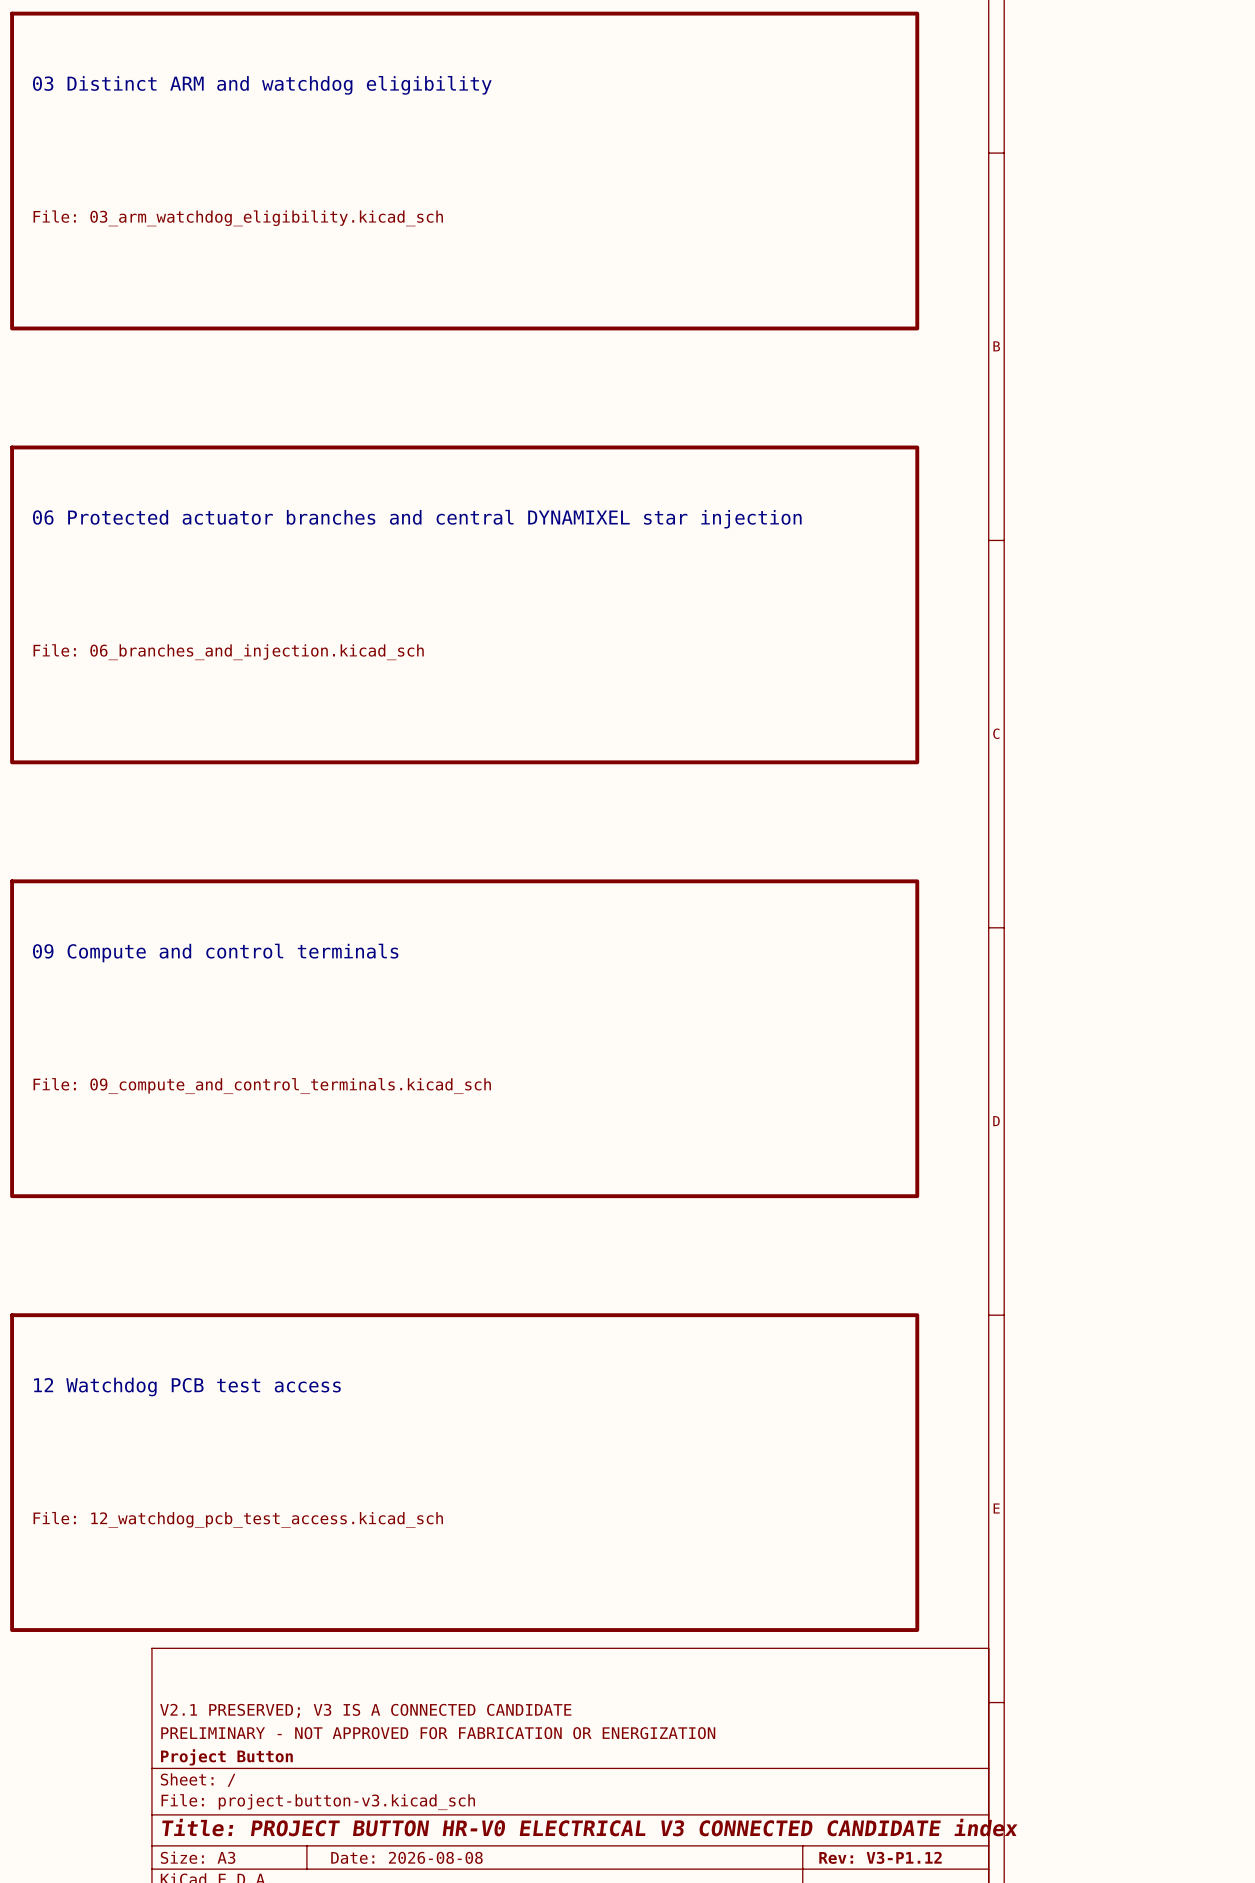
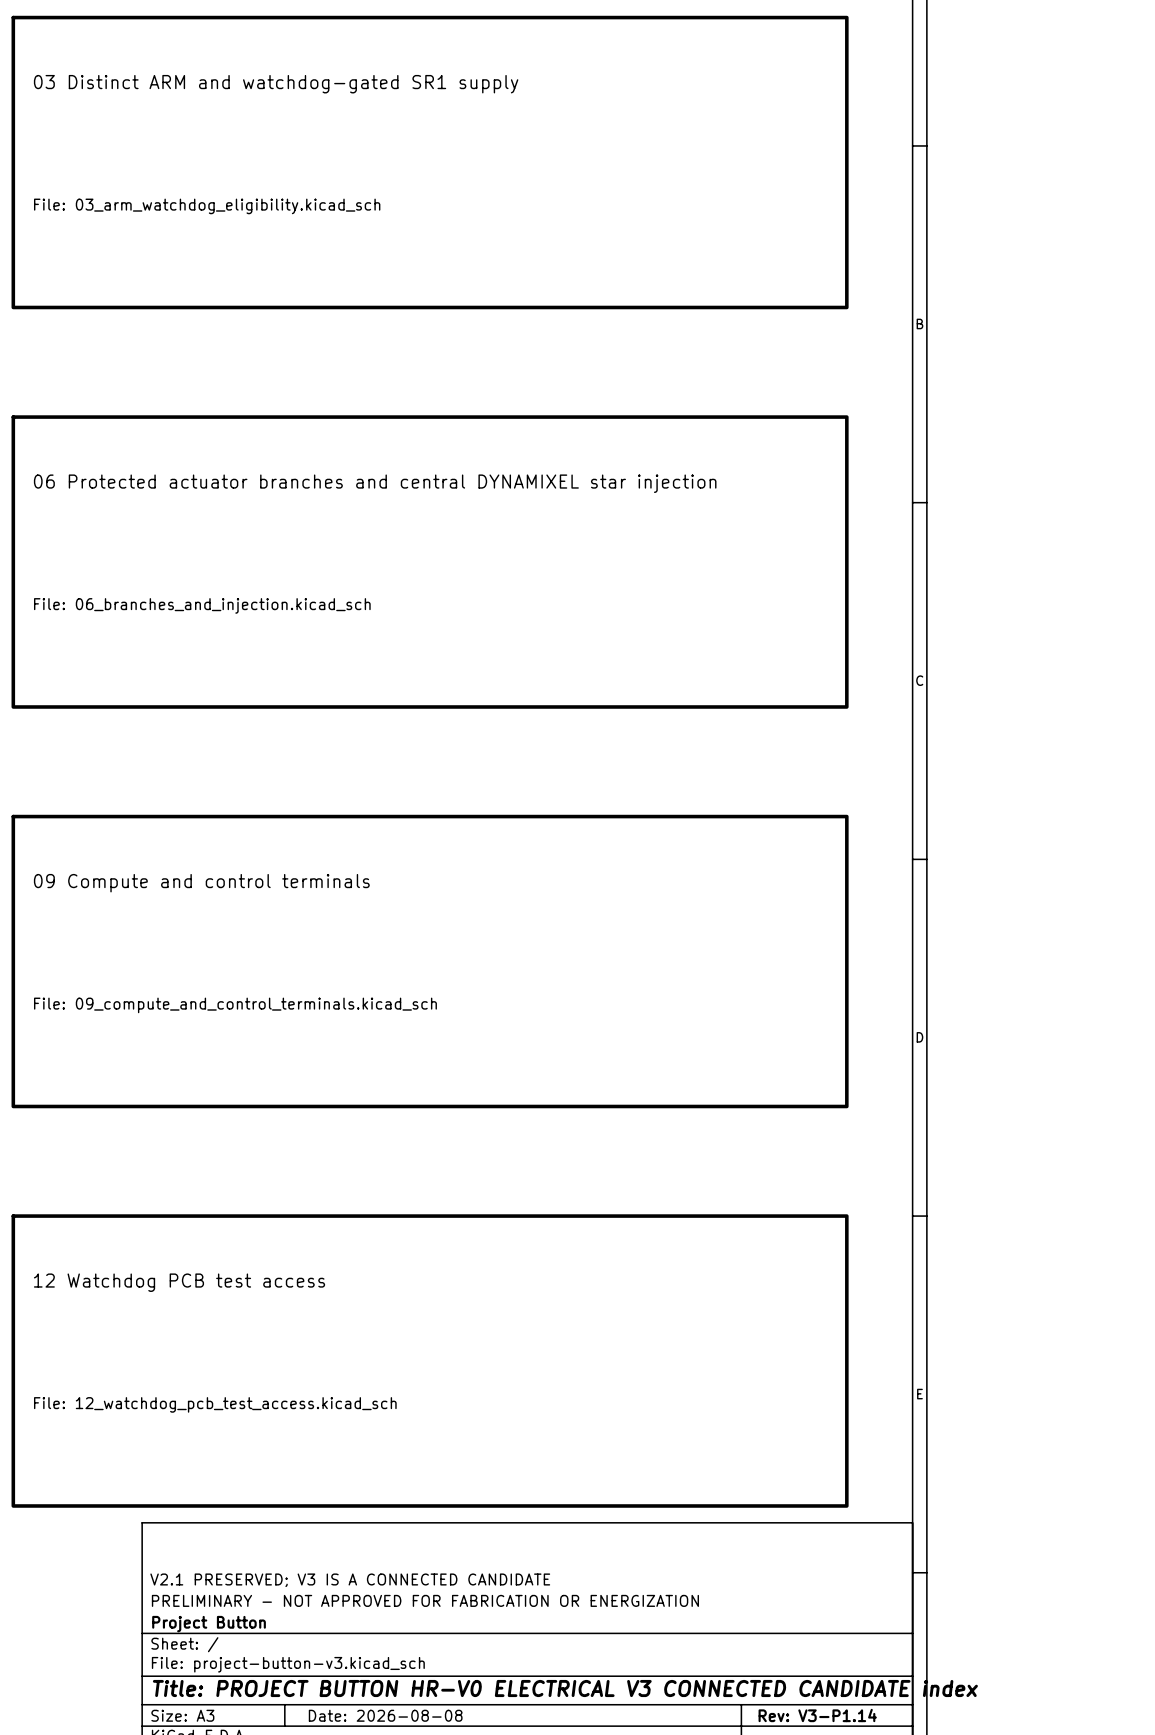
sheet 03 Distinct ARM and watchdog eligibility name: 03 Distinct ARM and watchdog eligibility (262, 85) -> 03 Distinct ARM and watchdog-gated SR1 supply (276, 84)
title block: Rev: V3-P1.12 (880, 1857) -> Rev: V3-P1.14 (817, 1715)

